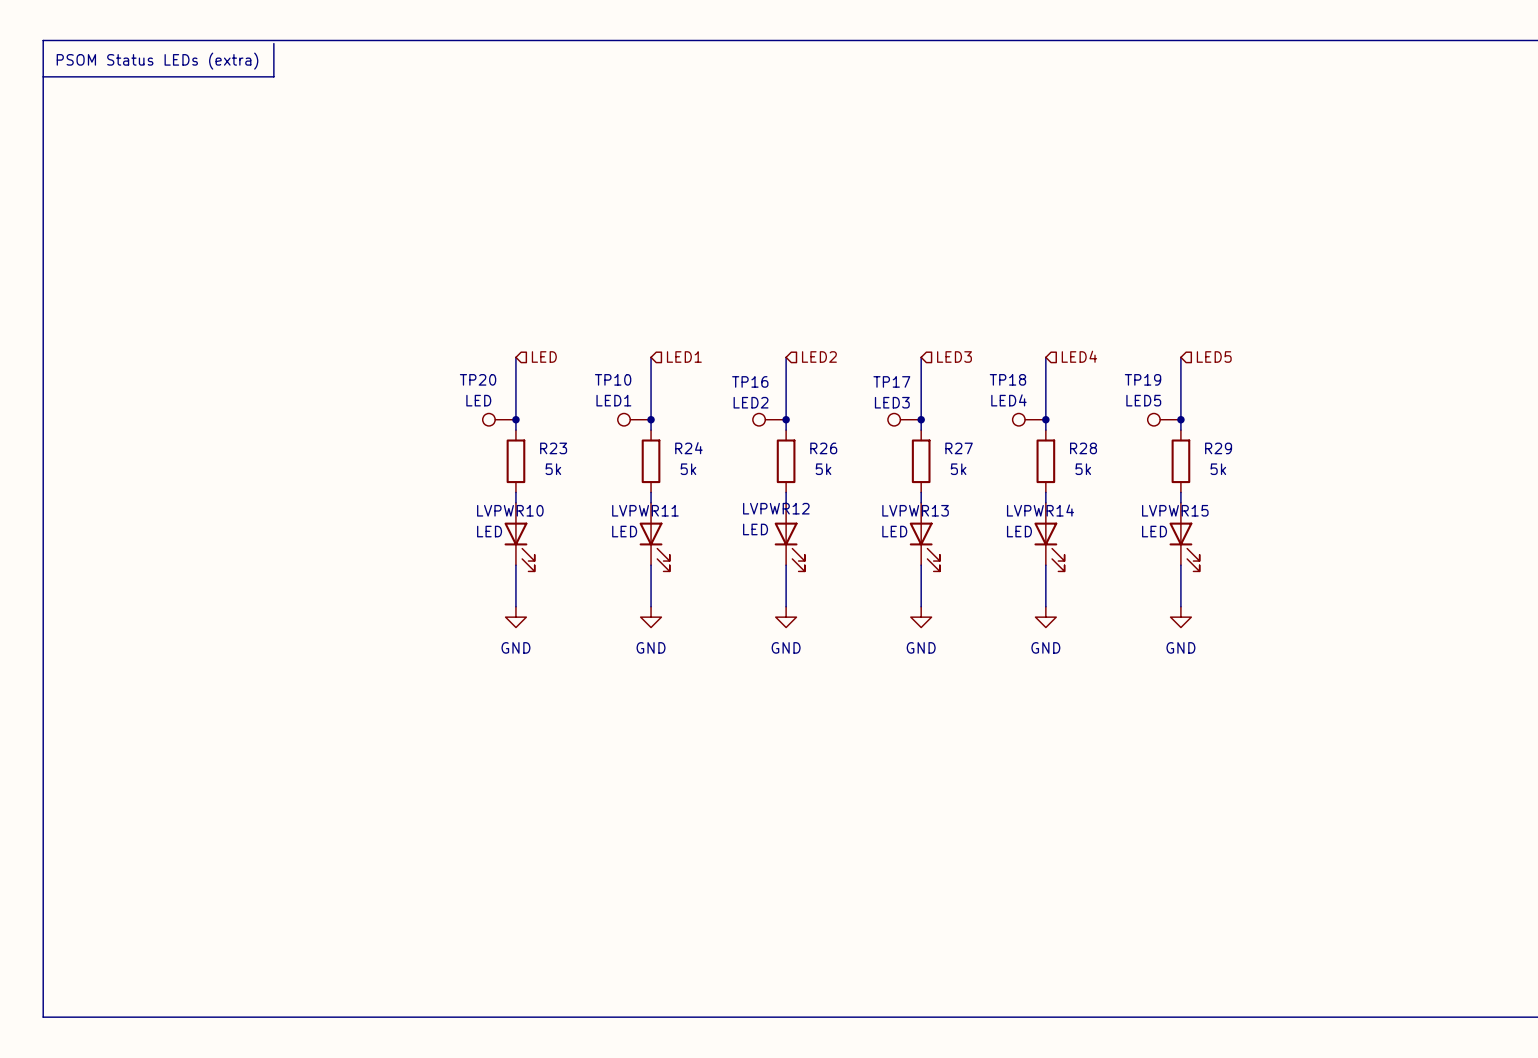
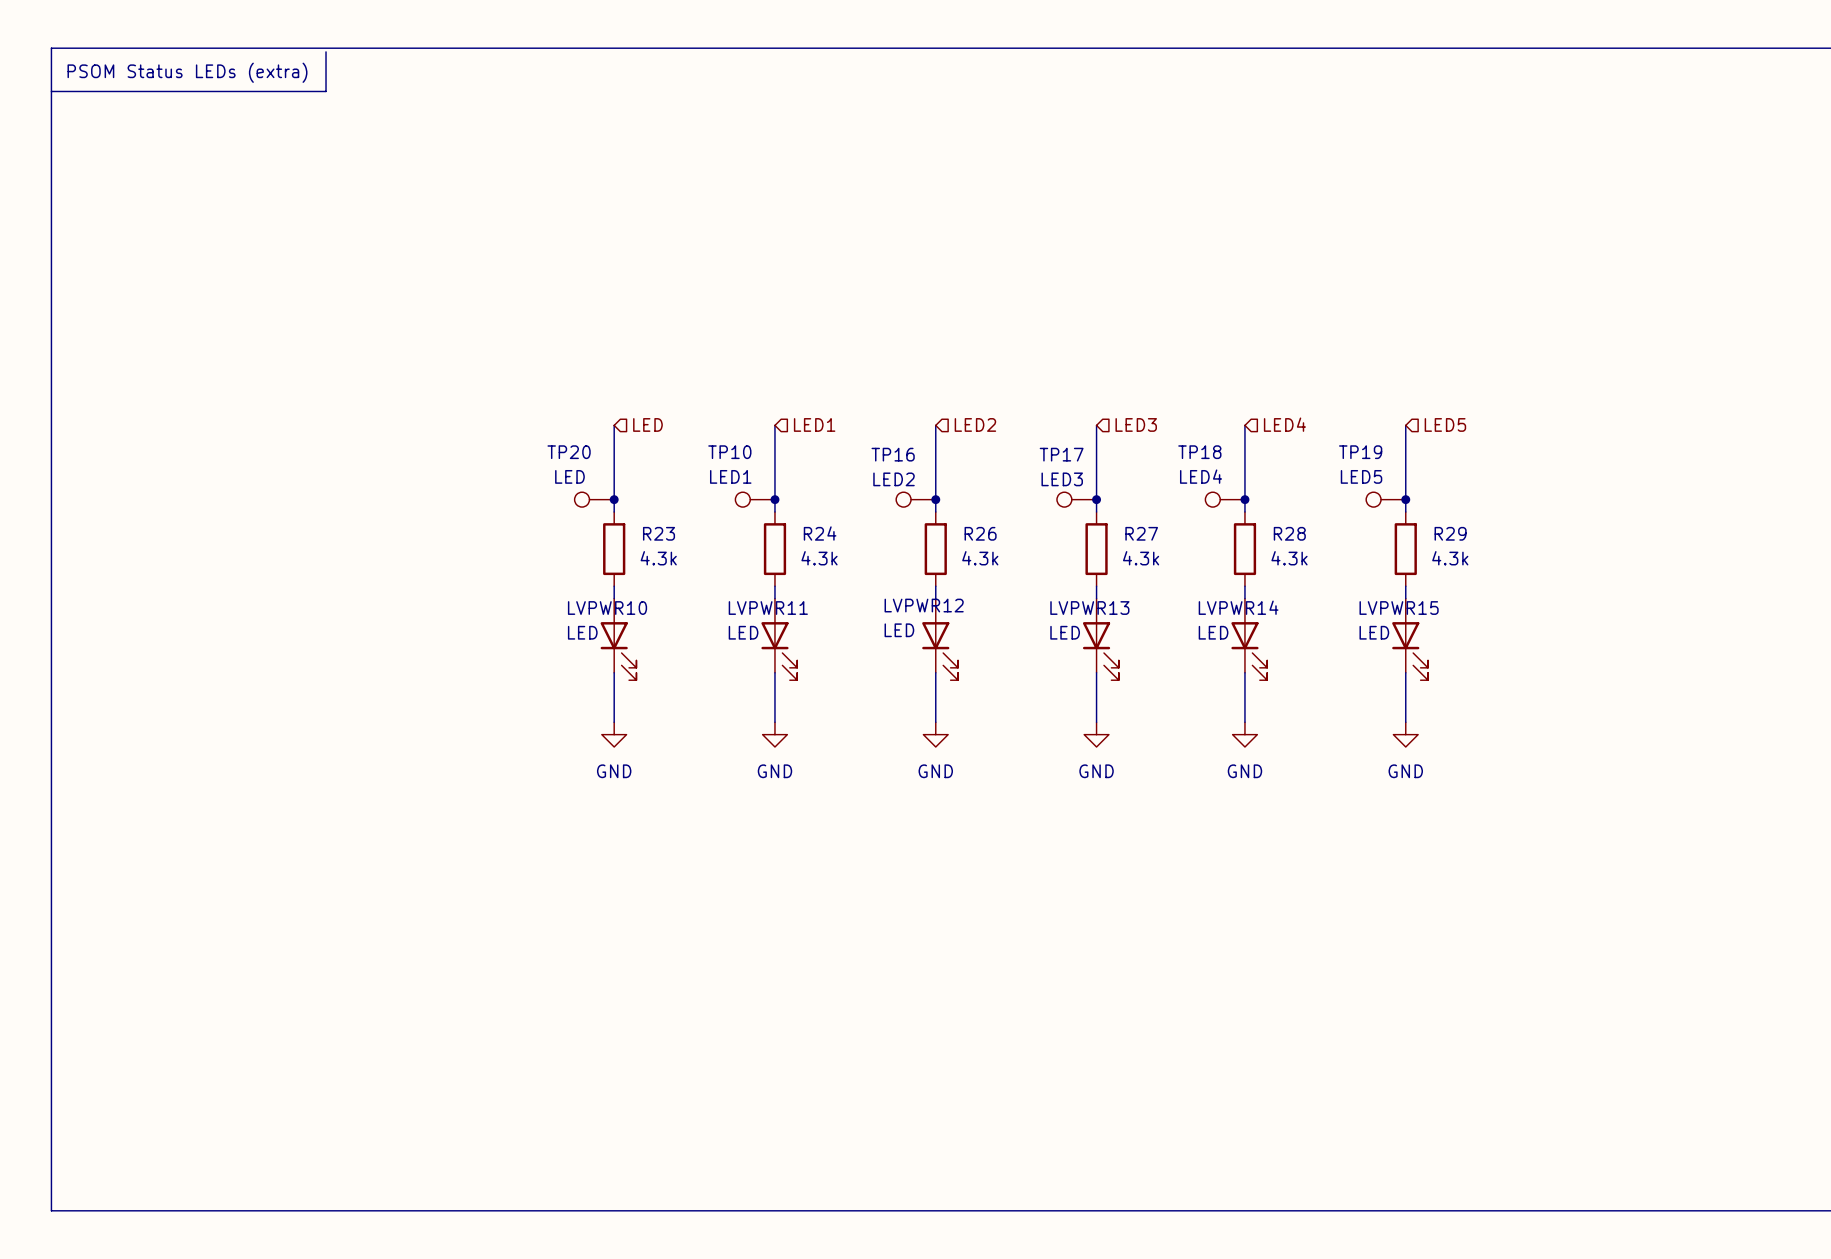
R23 value: 5k (553, 469) -> 4.3k (658, 558)
R24 value: 5k (688, 469) -> 4.3k (819, 558)
R26 value: 5k (823, 469) -> 4.3k (980, 558)
R27 value: 5k (958, 469) -> 4.3k (1141, 558)
R28 value: 5k (1083, 469) -> 4.3k (1289, 558)
R29 value: 5k (1218, 469) -> 4.3k (1450, 558)

